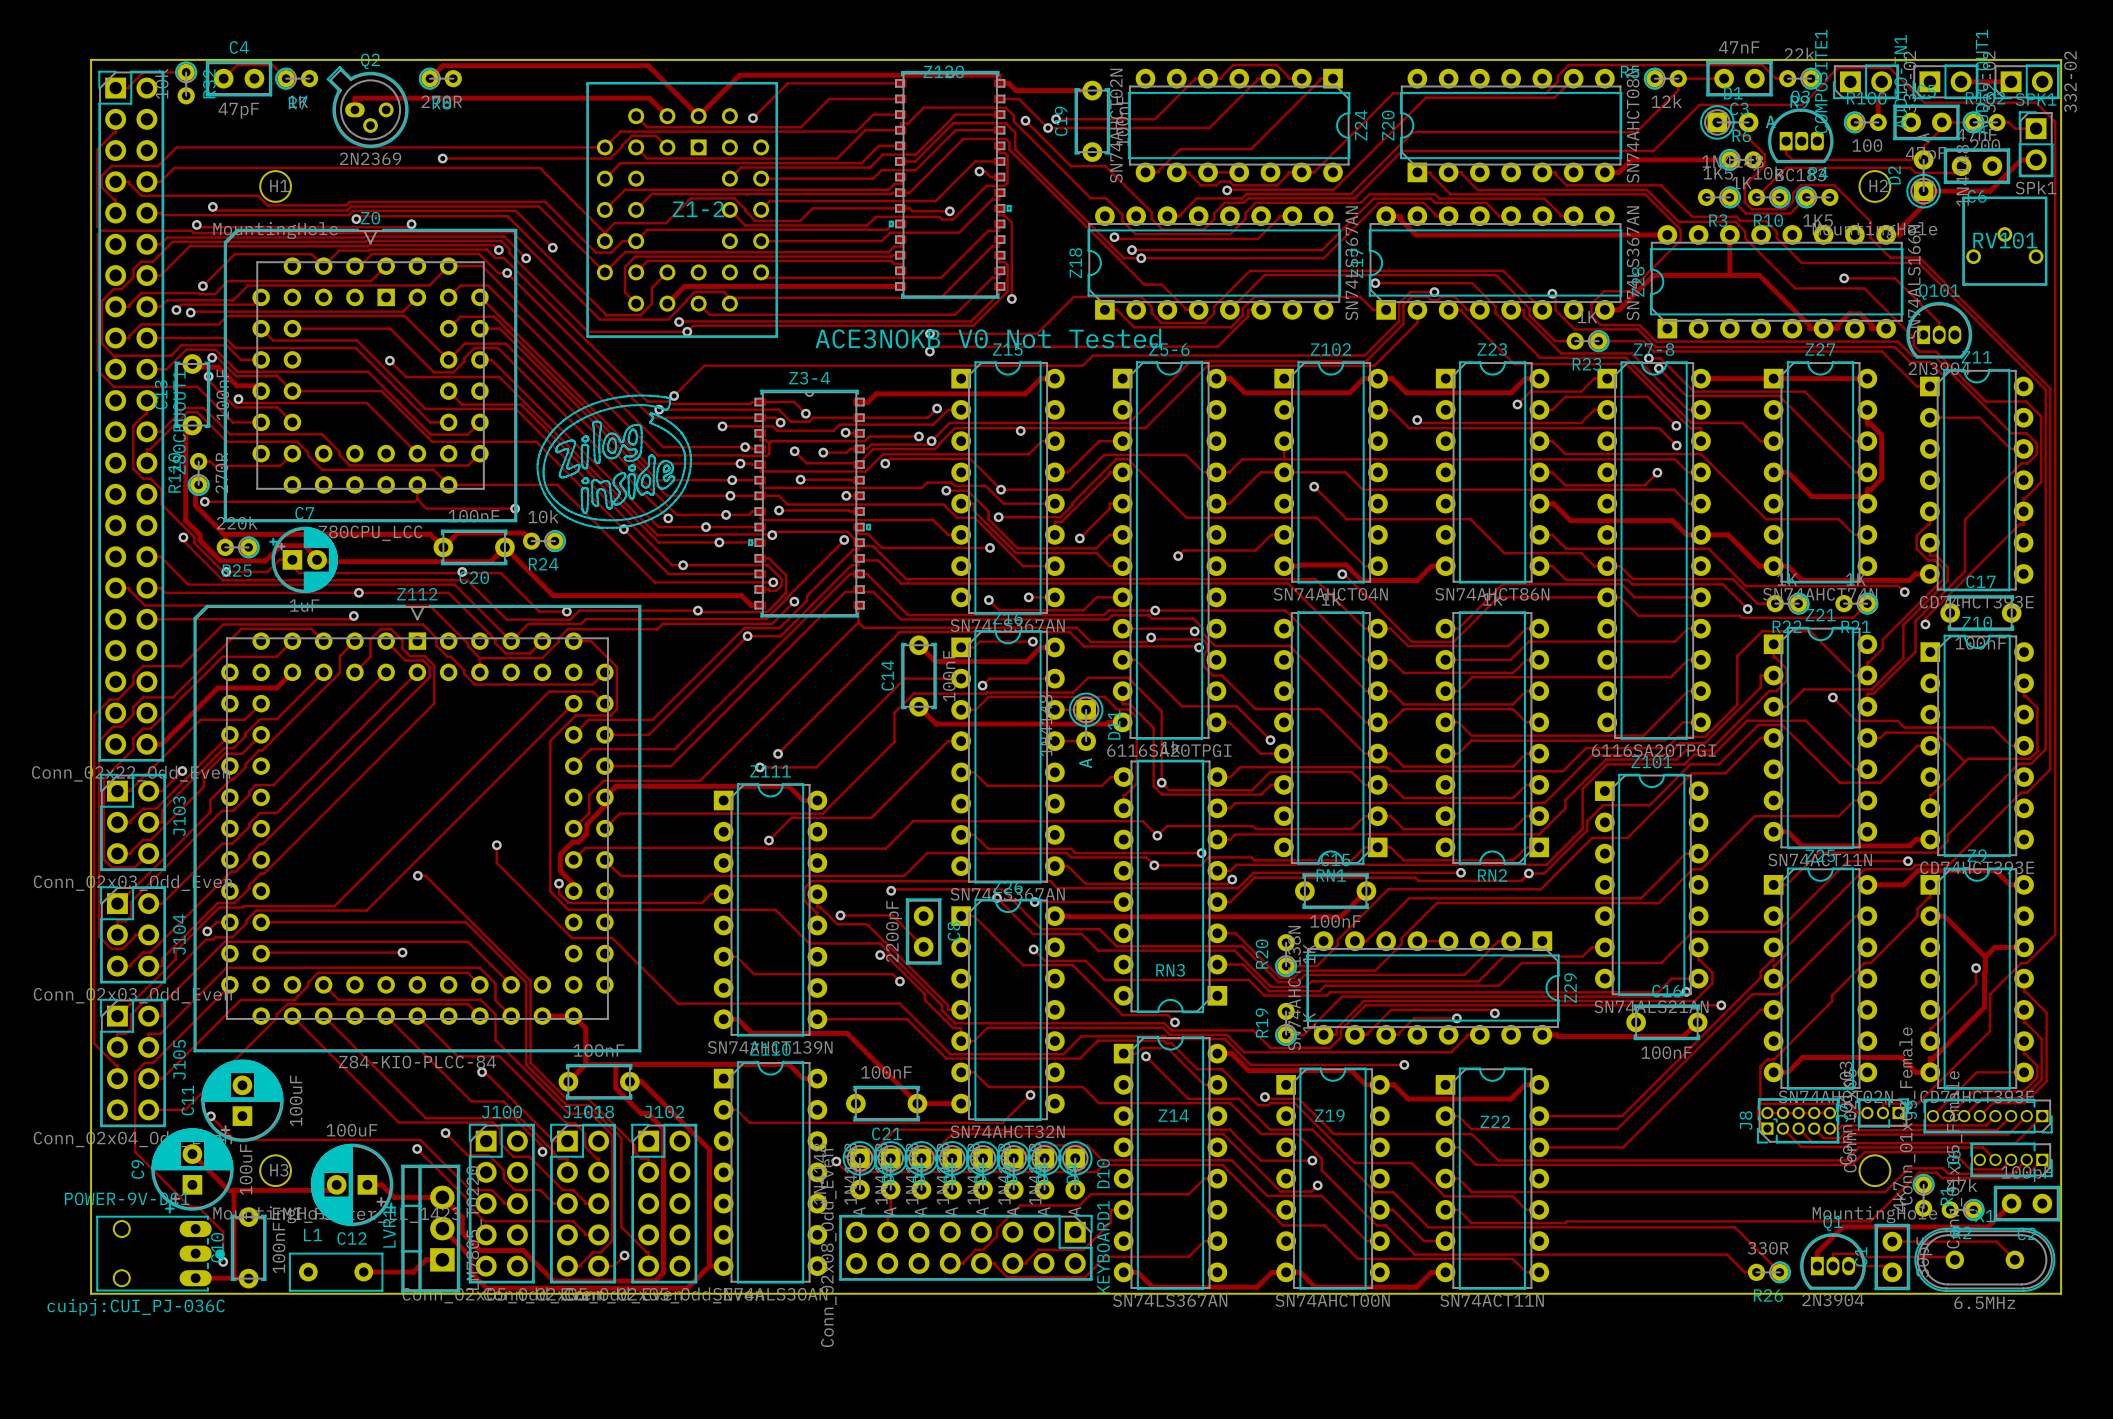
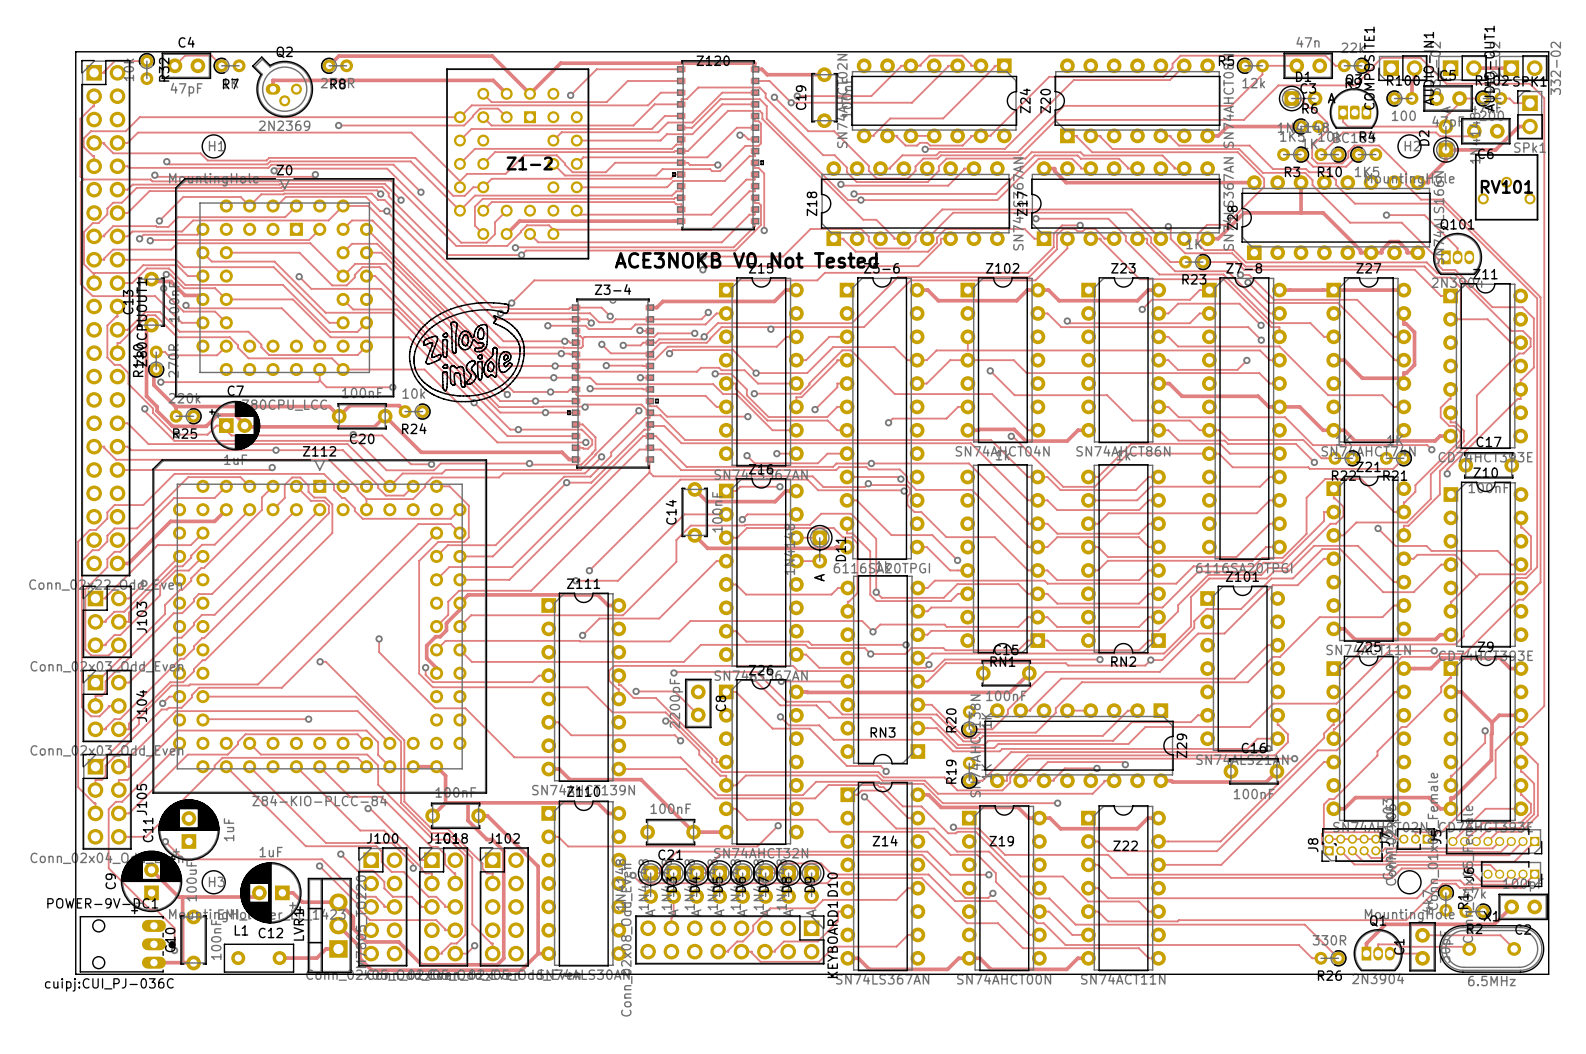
C3 value: 47nF (1739, 47) -> 47n (1308, 42)
C11 value: 100uF (296, 1100) -> 1uF (229, 829)
C12 value: 100uF (351, 1130) -> 1uF (271, 852)

